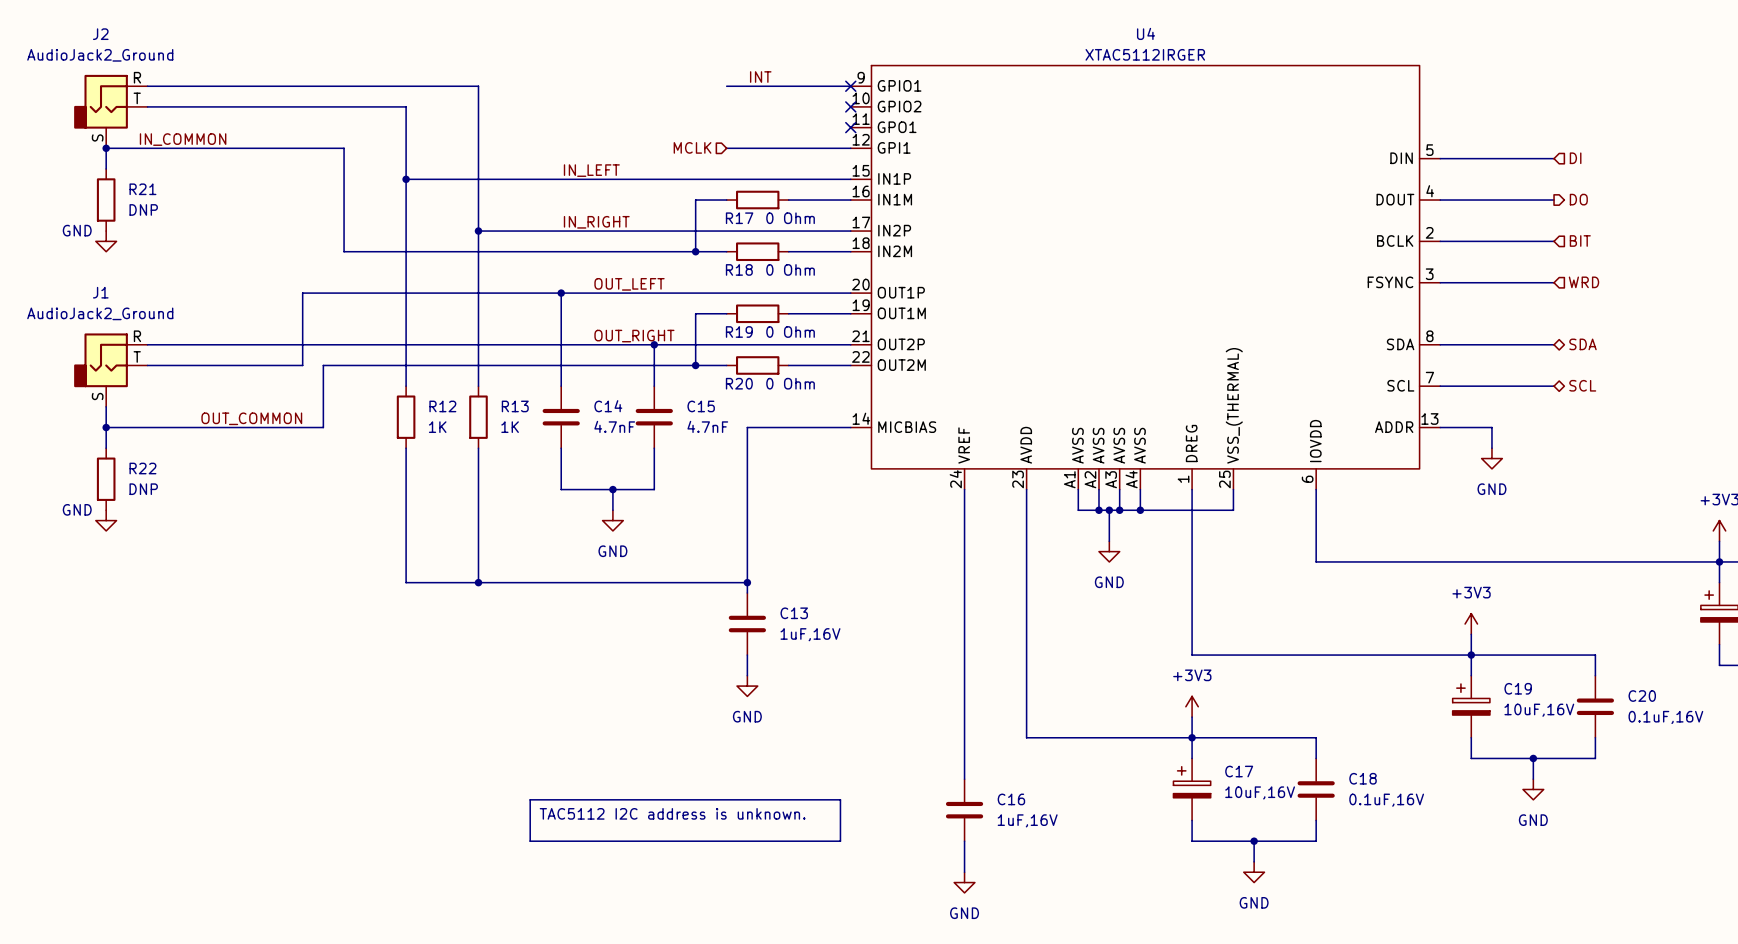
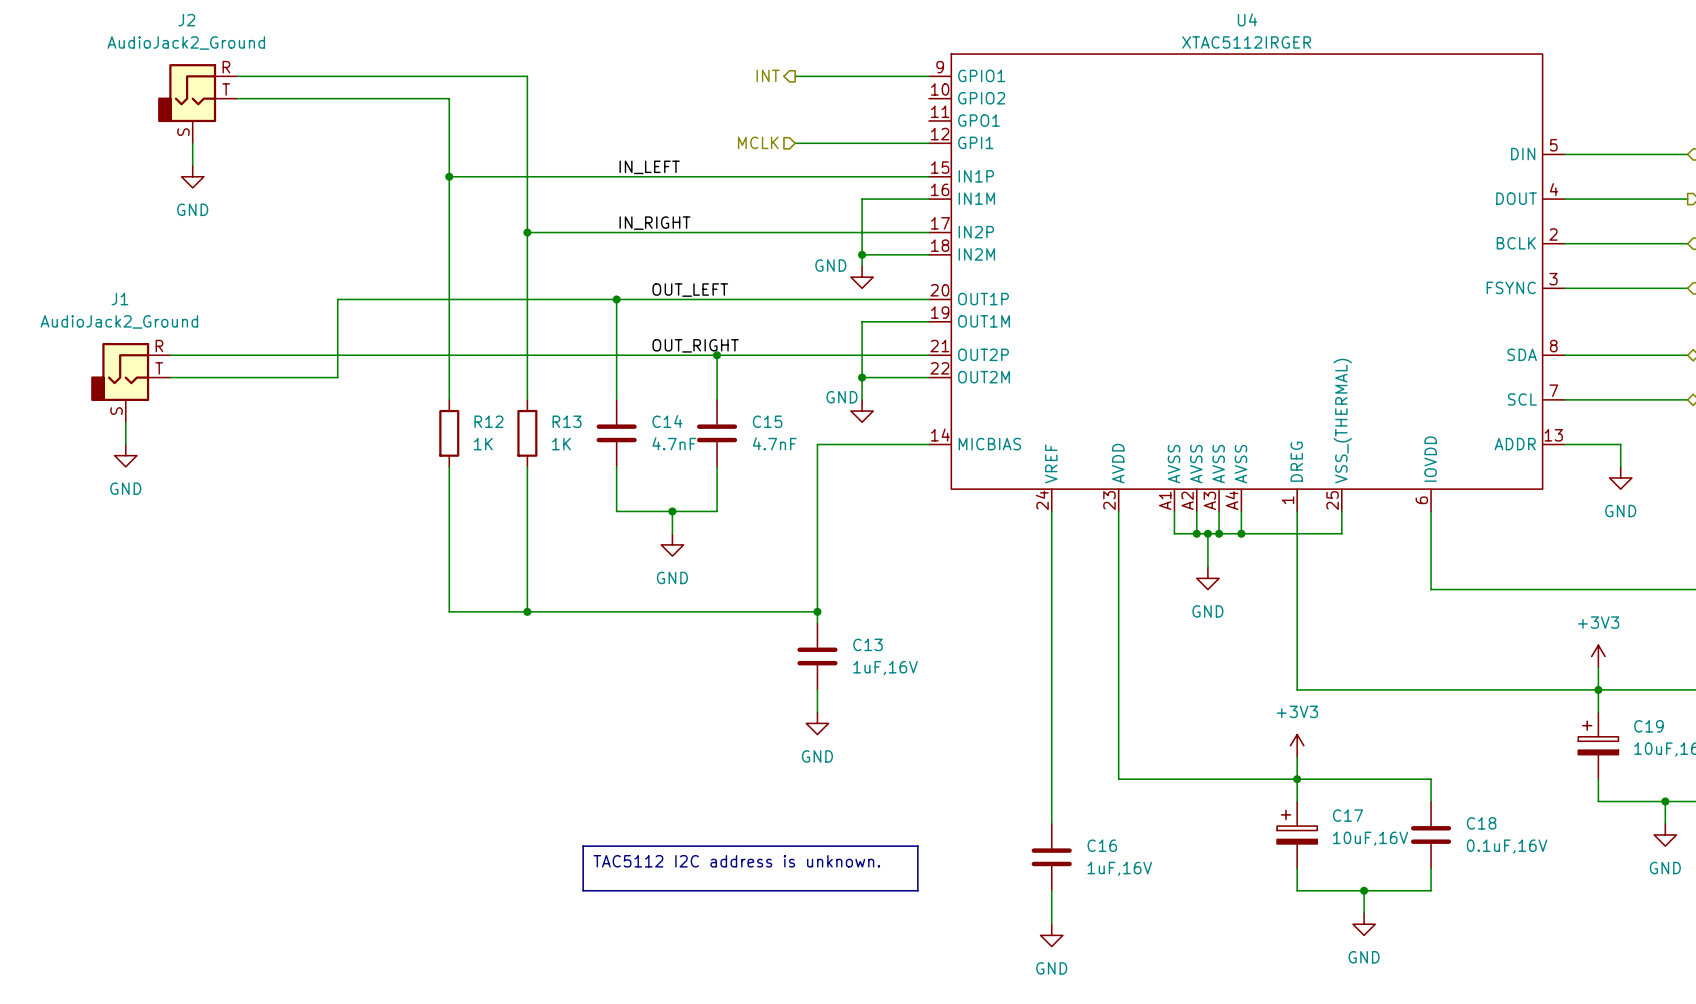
label: INT (760, 77) -> none
hierarchical label: none -> INT (768, 75)
no-connect mark: (850, 86) -> none
no-connect mark: (850, 106) -> none
J2 position: (110, 111) -> (197, 103)
no-connect mark: (850, 127) -> none
label: IN_COMMON (183, 139) -> none
junction: (106, 148) -> none
wire: none -> (192, 143) (192, 165)
wire: (106, 168) (106, 148) (344, 148) (344, 251) (726, 251) -> none
R21: DNP (106, 200) -> none
wire: (726, 200) (695, 200) (695, 251) -> none
R17: 0 Ohm (757, 200) -> none
wire: none -> (862, 199) (862, 266)
power symbol text position: GND (77, 230) -> GND (192, 209)
power symbol position: GND (106, 241) -> GND (192, 176)
junction: (695, 251) -> none
R18: 0 Ohm (757, 251) -> none
junction: none -> (862, 254)
power symbol: none -> GND (862, 277)
wire: (726, 313) (695, 313) (695, 365) -> none
R19: 0 Ohm (757, 313) -> none
wire: none -> (862, 321) (862, 399)
junction: (695, 365) -> none
wire: (726, 365) (323, 365) (323, 427) (106, 427) (106, 448) -> none
R20: 0 Ohm (757, 365) -> none
junction: none -> (862, 377)
power symbol: none -> GND (862, 411)
label: OUT_COMMON (251, 418) -> none
junction: (106, 427) -> none
R22: DNP (106, 479) -> none
power symbol text position: GND (77, 509) -> GND (125, 488)
power symbol position: GND (106, 520) -> GND (125, 455)

